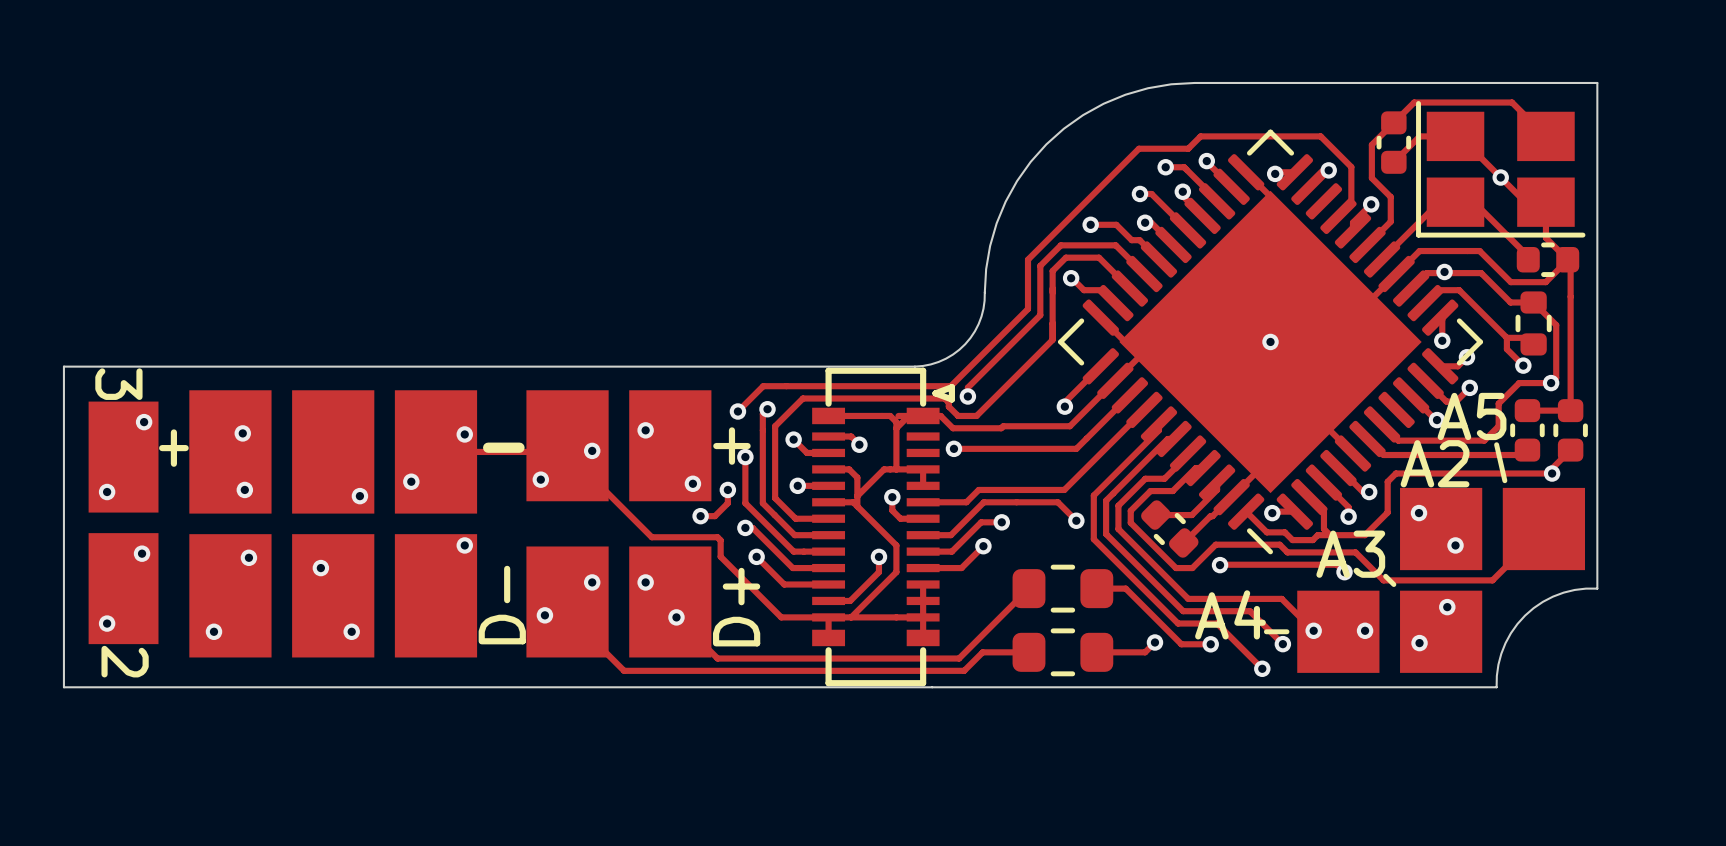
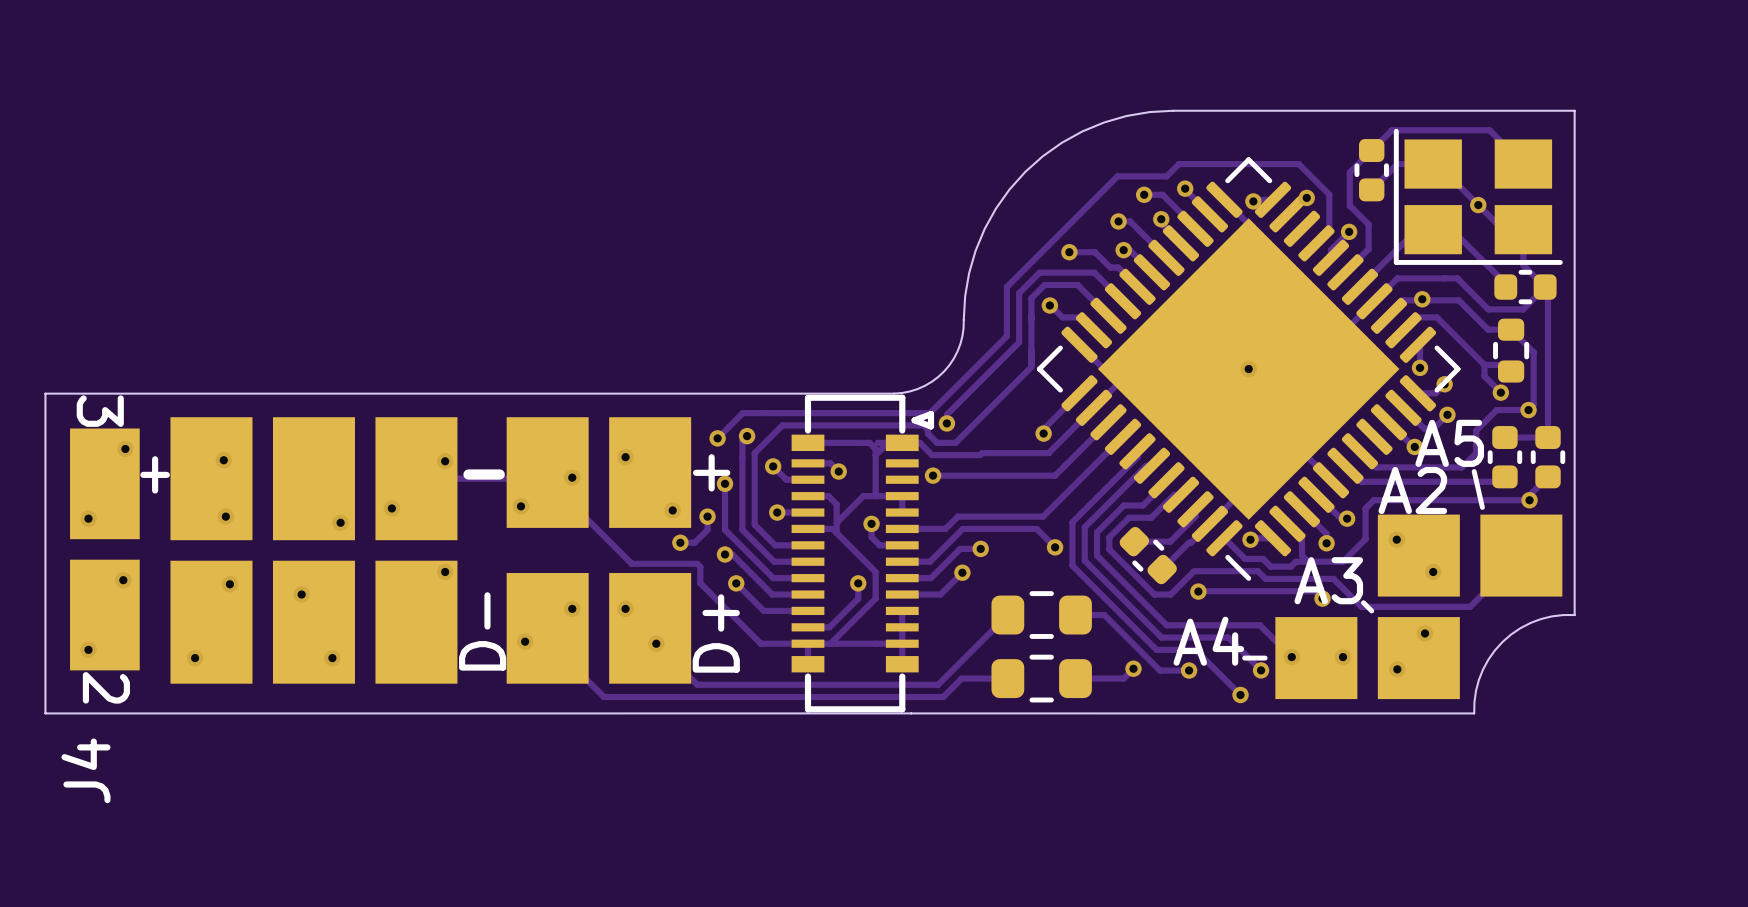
J4 name: none -> J4 (85, 770)

